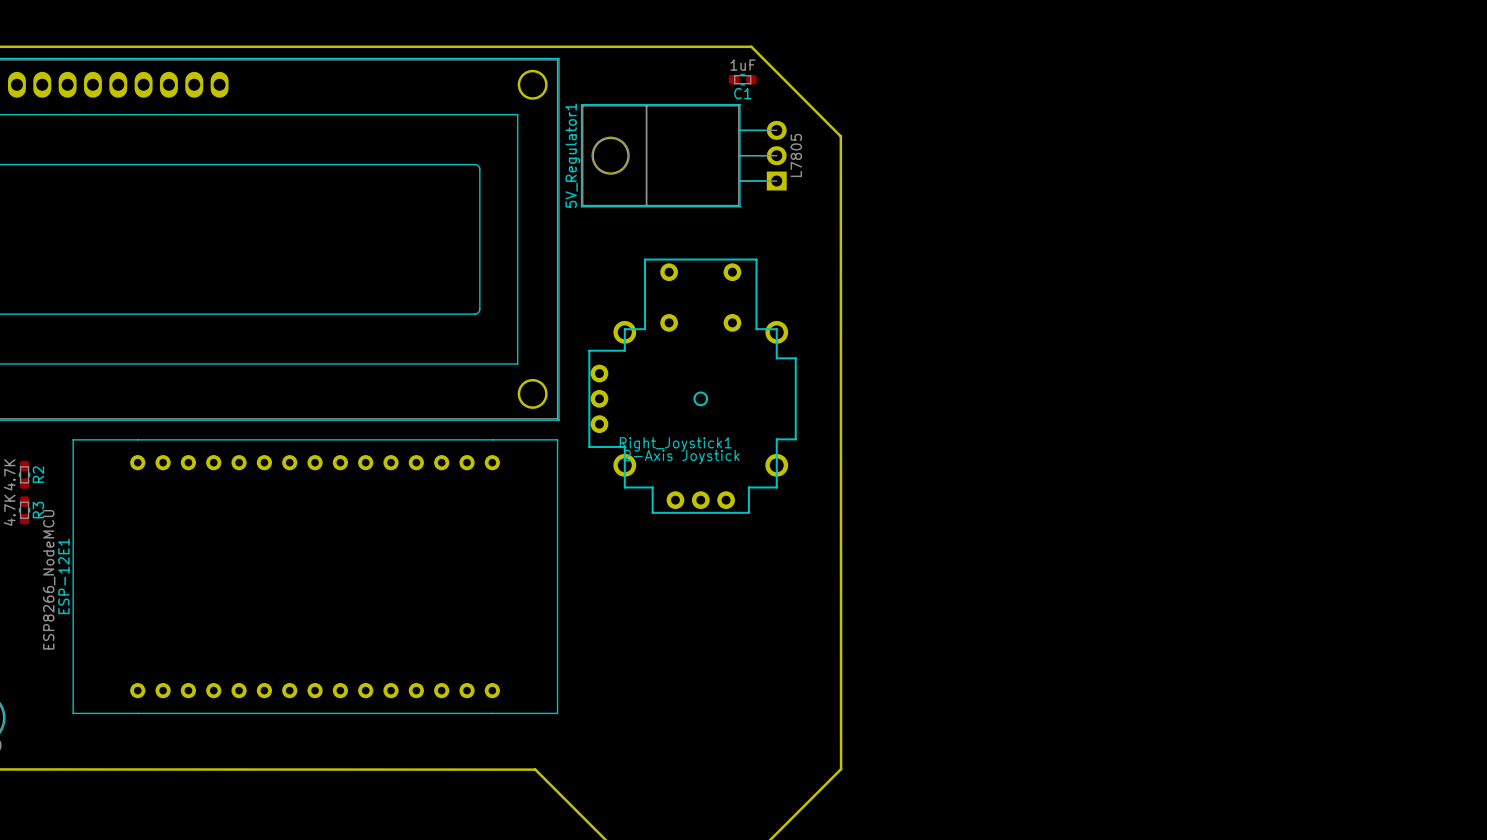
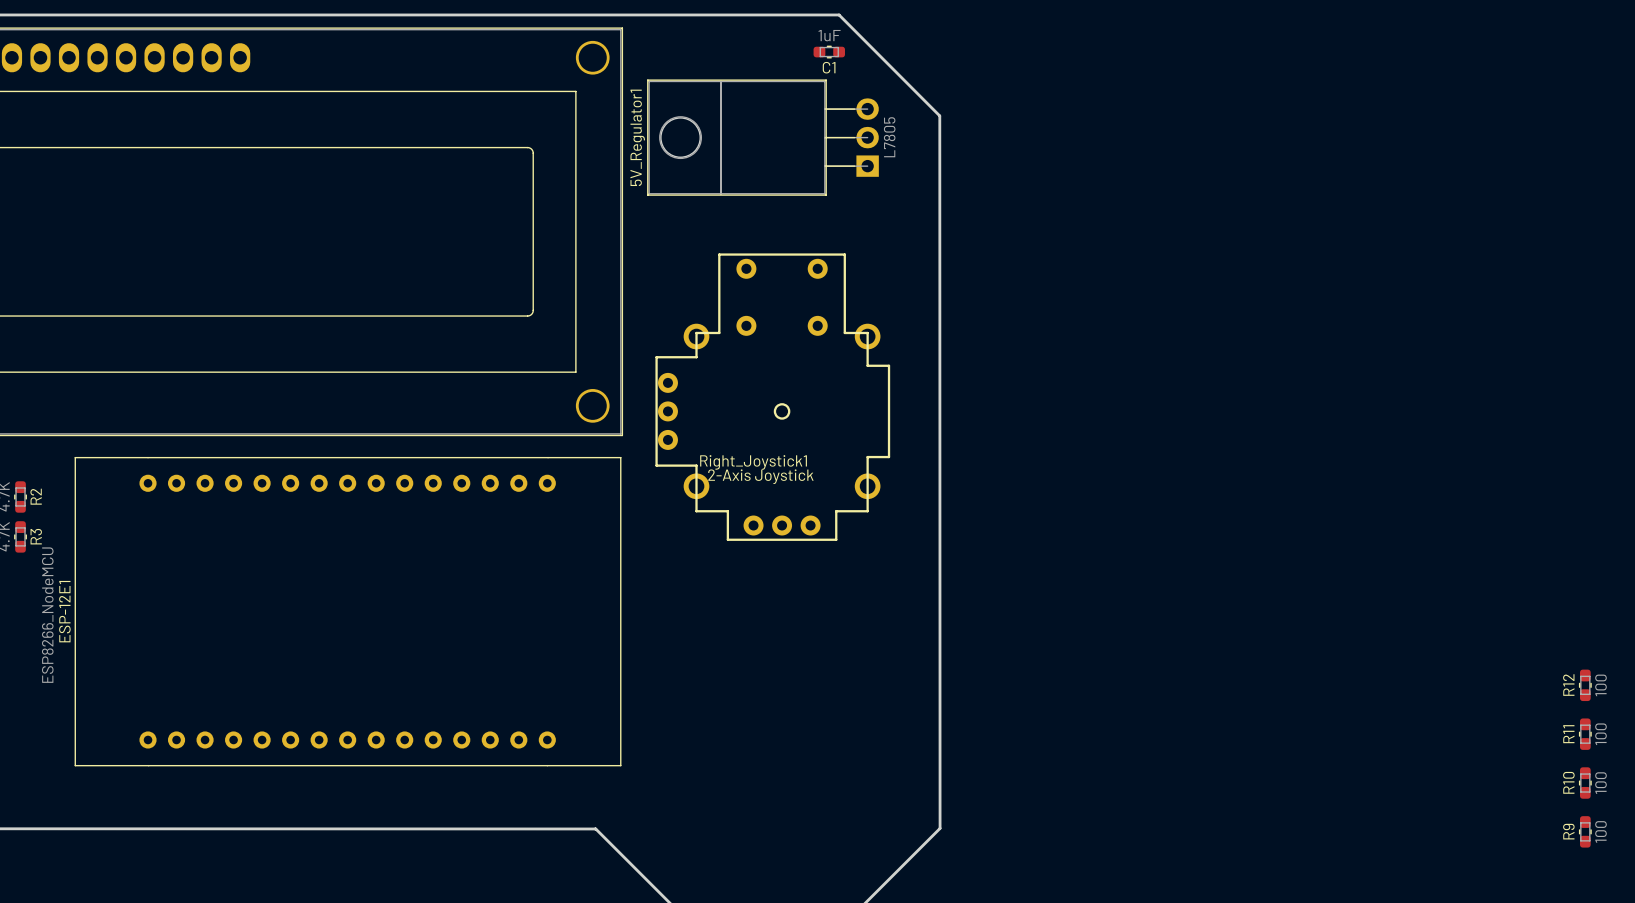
R12: none -> 100 (1585, 685)
R11: none -> 100 (1585, 734)
R10: none -> 100 (1585, 783)
R9: none -> 100 (1585, 831)

